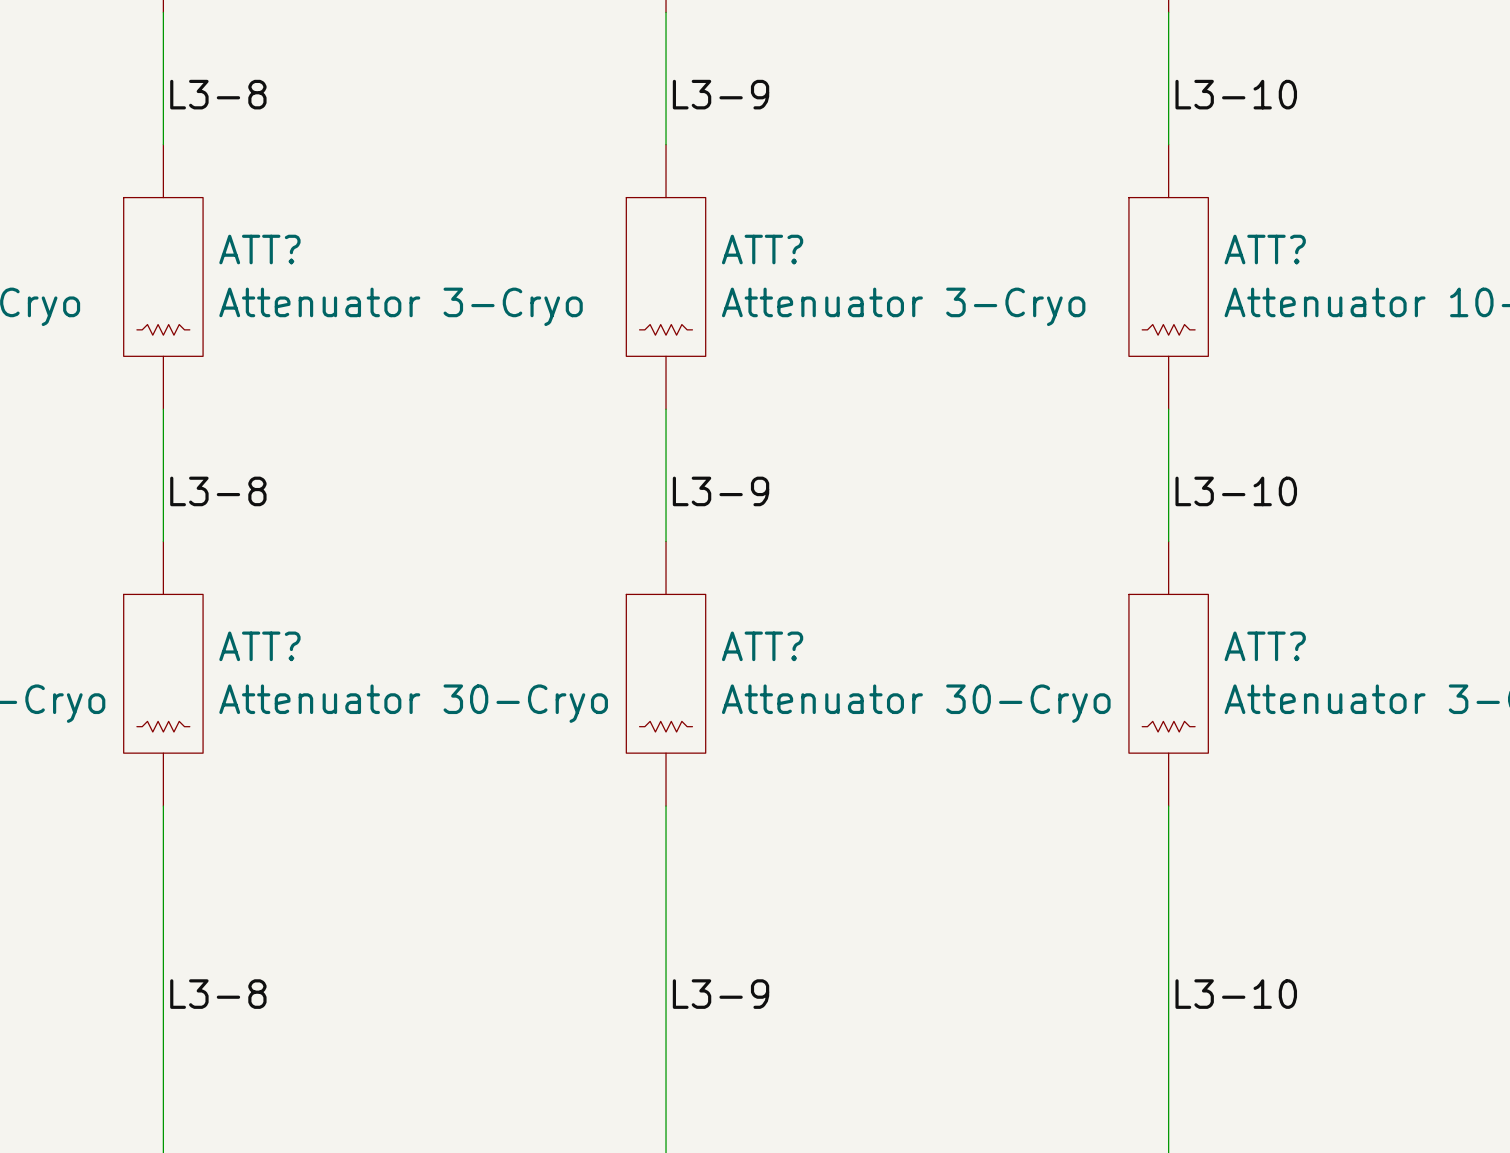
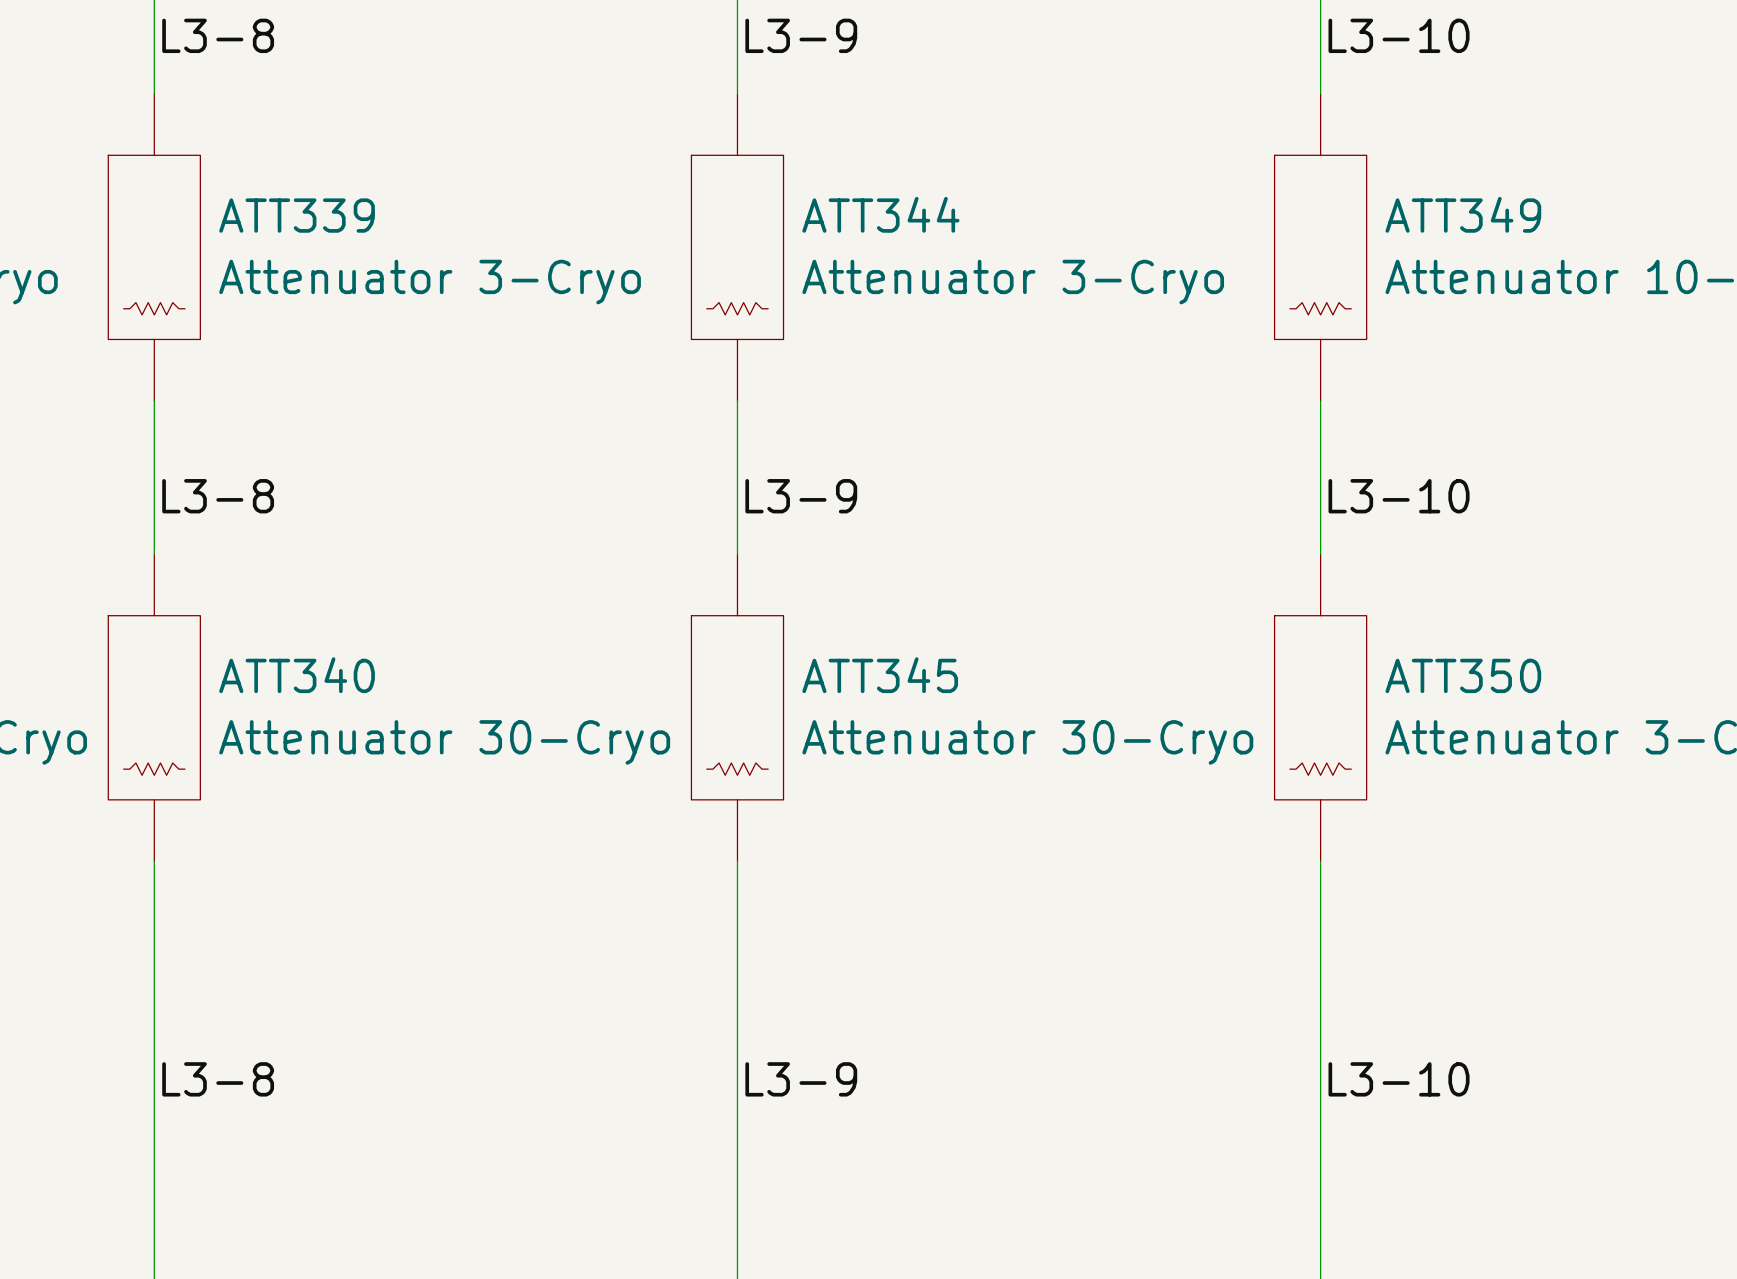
ATT? name: ATT? (259, 249) -> ATT339 (297, 215)
ATT? name: ATT? (762, 249) -> ATT344 (880, 214)
ATT? name: ATT? (1265, 249) -> ATT349 (1463, 214)
ATT? name: ATT? (259, 646) -> ATT340 (297, 675)
ATT? name: ATT? (762, 646) -> ATT345 (880, 675)
ATT? name: ATT? (1265, 646) -> ATT350 (1463, 675)

